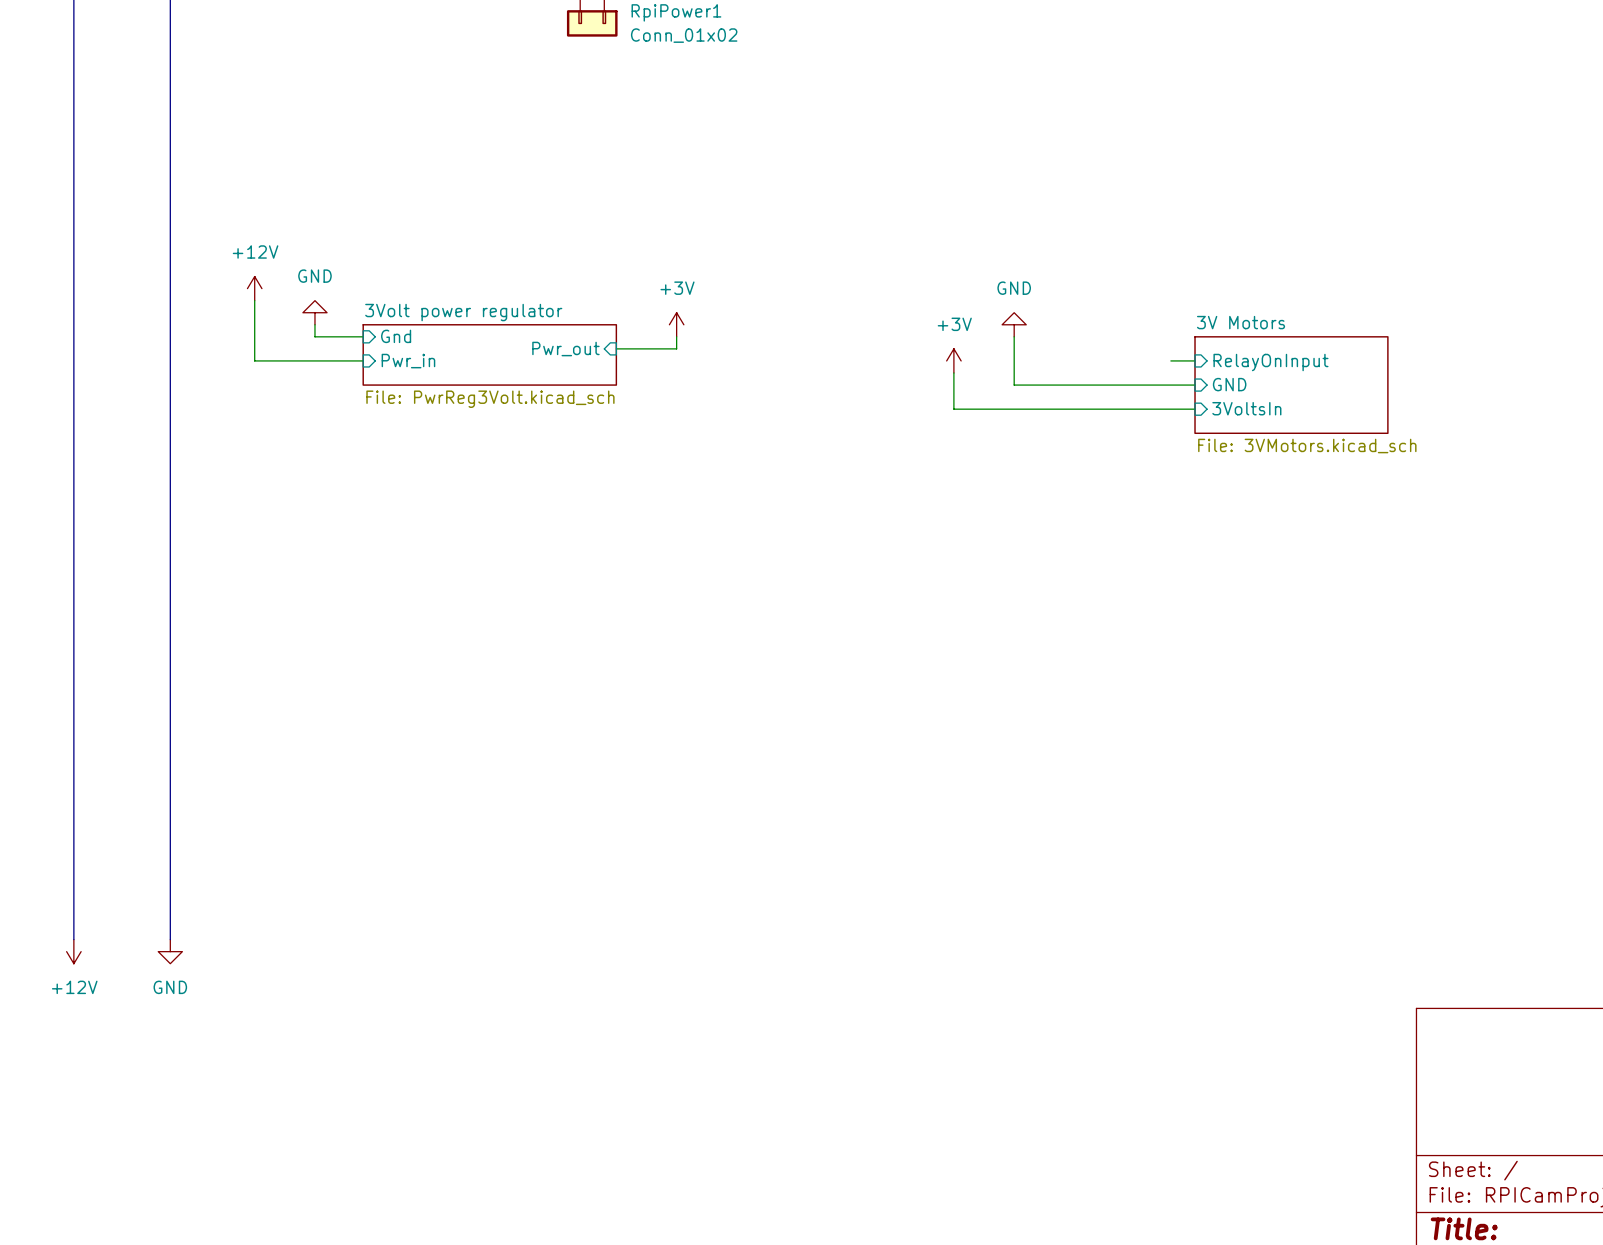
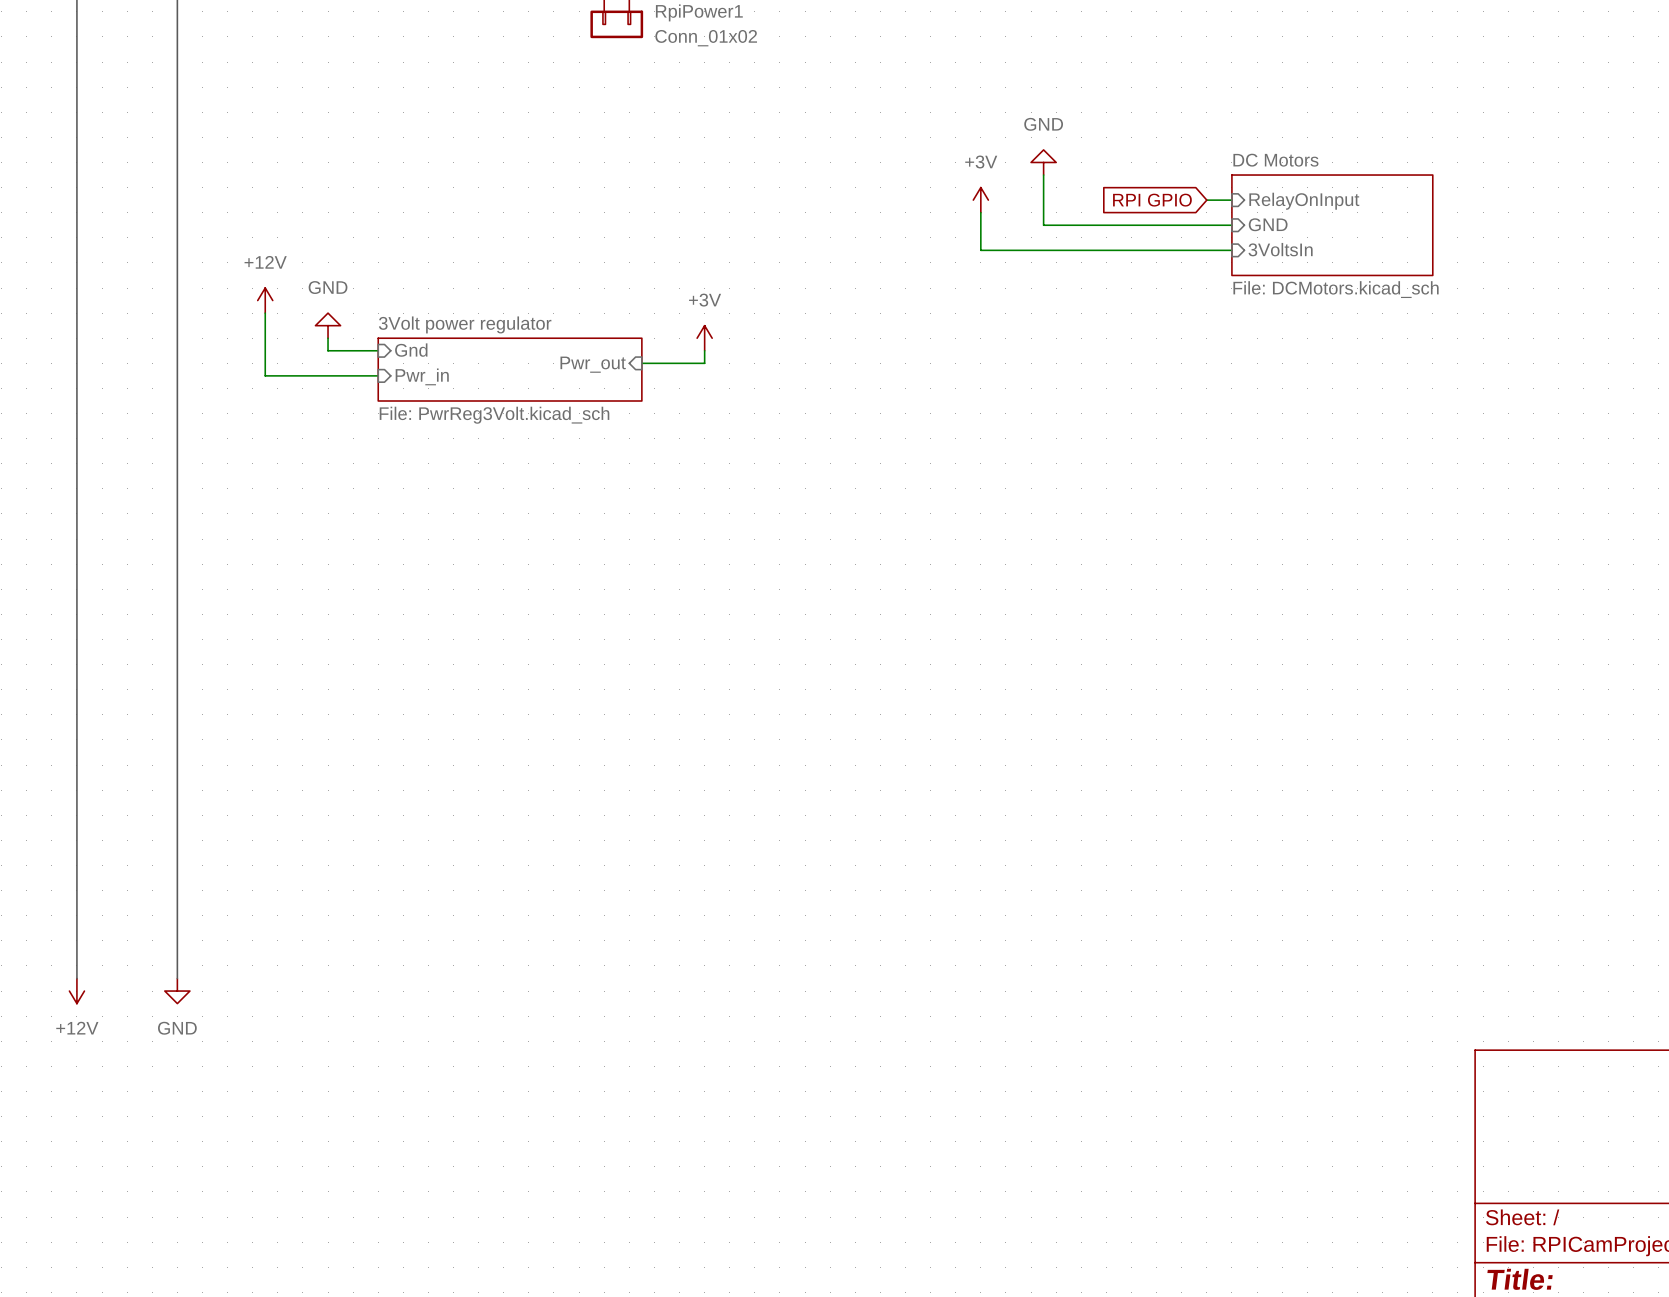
global label: none -> RPI GPIO (1152, 200)
sheet DC Motors: none -> File: DCMotors.kicad_sch (1332, 225)
power symbol position: GND (1014, 324) -> GND (1043, 162)
wire: (1014, 336) (1014, 385) (1195, 385) -> (1043, 175) (1043, 225) (1231, 225)
power symbol position: +3V (953, 360) -> +3V (980, 200)
wire: (1170, 360) (1195, 360) -> (1206, 200) (1231, 200)
sheet pin position: RelayOnInput (1270, 362) -> RelayOnInput (1304, 201)
wire: (953, 373) (953, 409) (1195, 409) -> (980, 212) (980, 250) (1231, 250)
sheet pin position: GND (1229, 384) -> GND (1268, 224)
sheet 3V Motors: File: 3VMotors.kicad_sch (1291, 385) -> none
sheet pin position: 3VoltsIn (1246, 408) -> 3VoltsIn (1280, 249)

